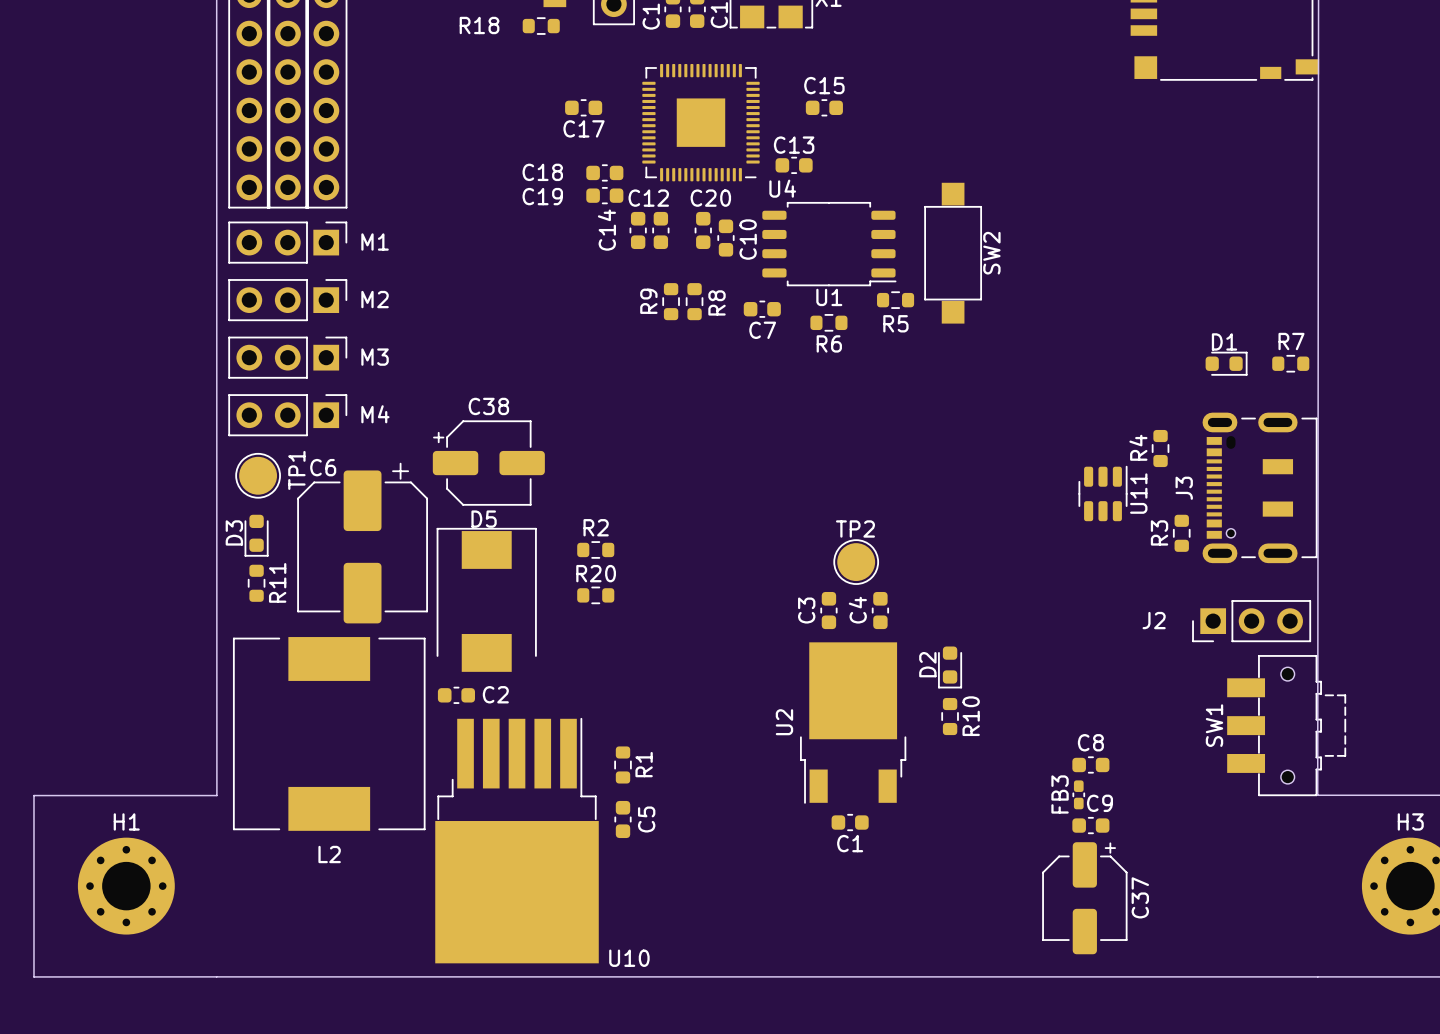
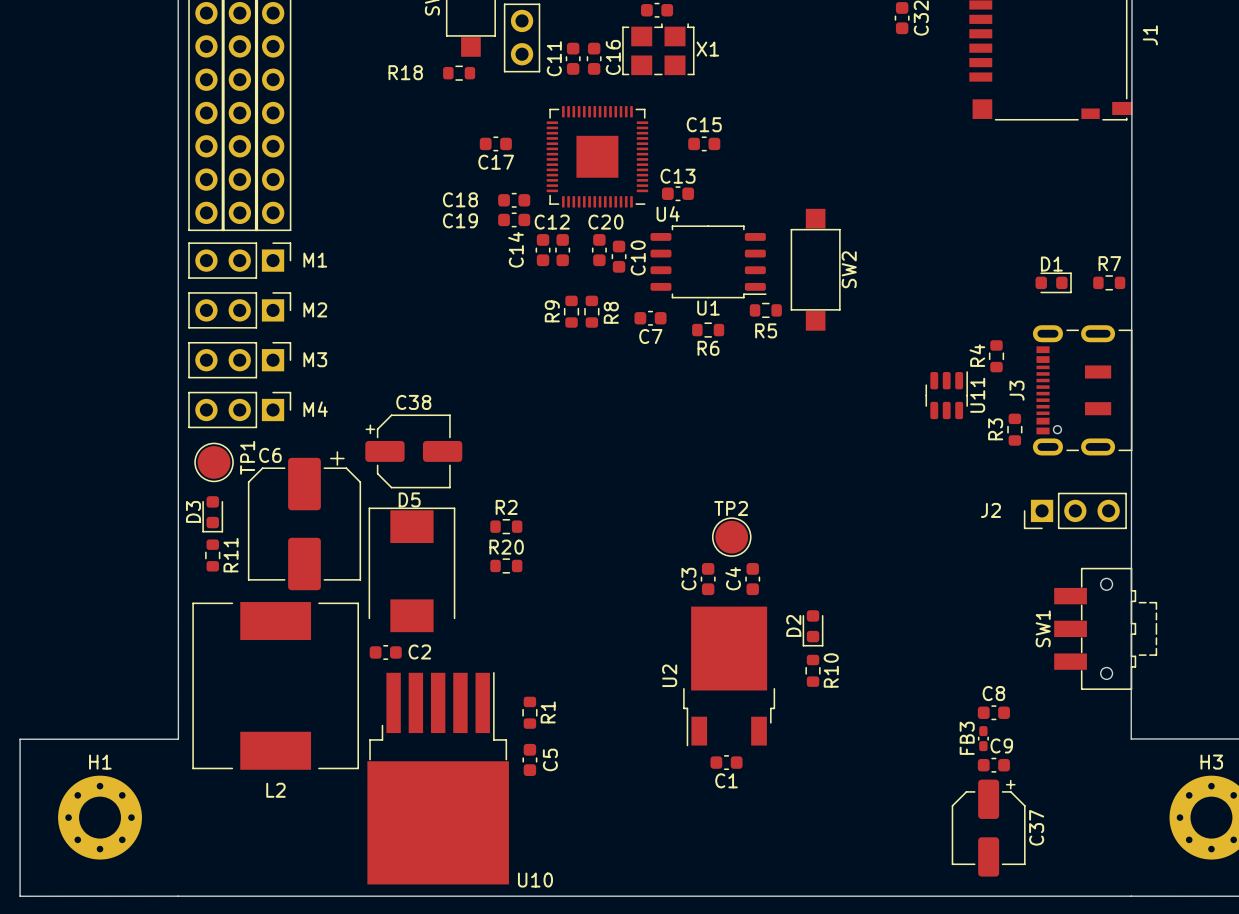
D1 position: (1226, 363) -> (1053, 282)
R7 position: (1290, 363) -> (1109, 282)
R4 position: (1160, 448) -> (996, 356)
J3 position: (1260, 487) -> (1082, 390)
U11 position: (1103, 493) -> (946, 395)
R3 position: (1181, 533) -> (1014, 429)
J2 position: (1251, 621) -> (1075, 510)
SW1 position: (1286, 725) -> (1105, 628)
C8 position: (1090, 764) -> (993, 712)
FB3 position: (1078, 794) -> (983, 738)
C9 position: (1090, 825) -> (993, 765)
C37 position: (1084, 898) -> (988, 828)

